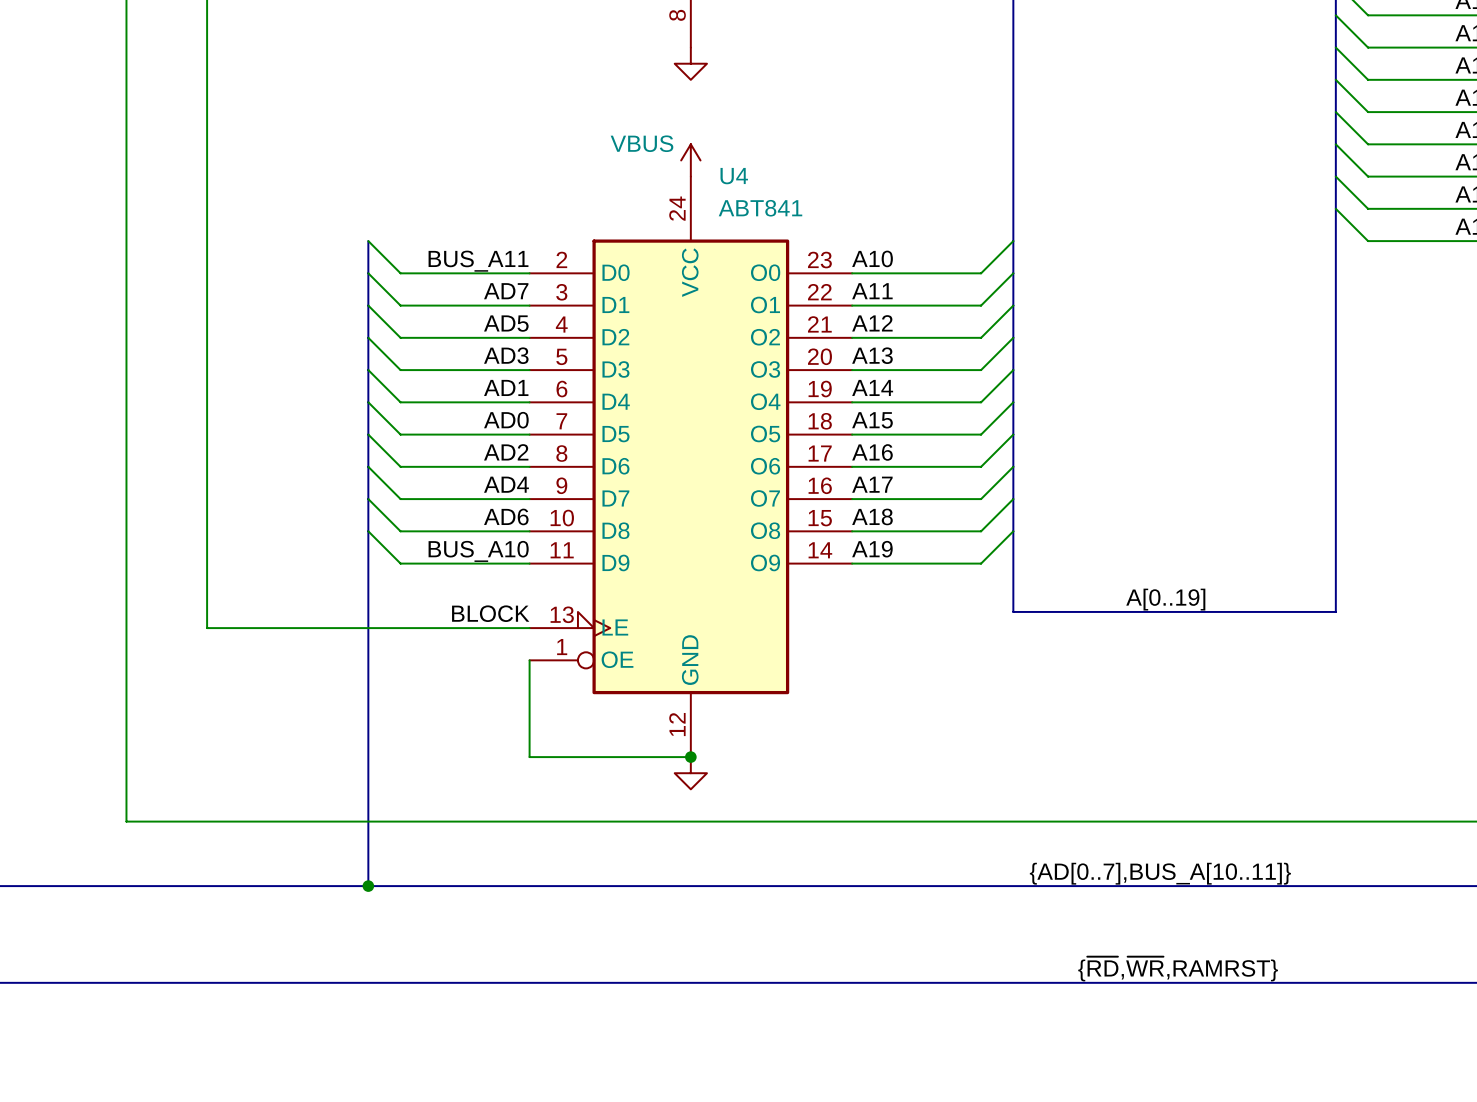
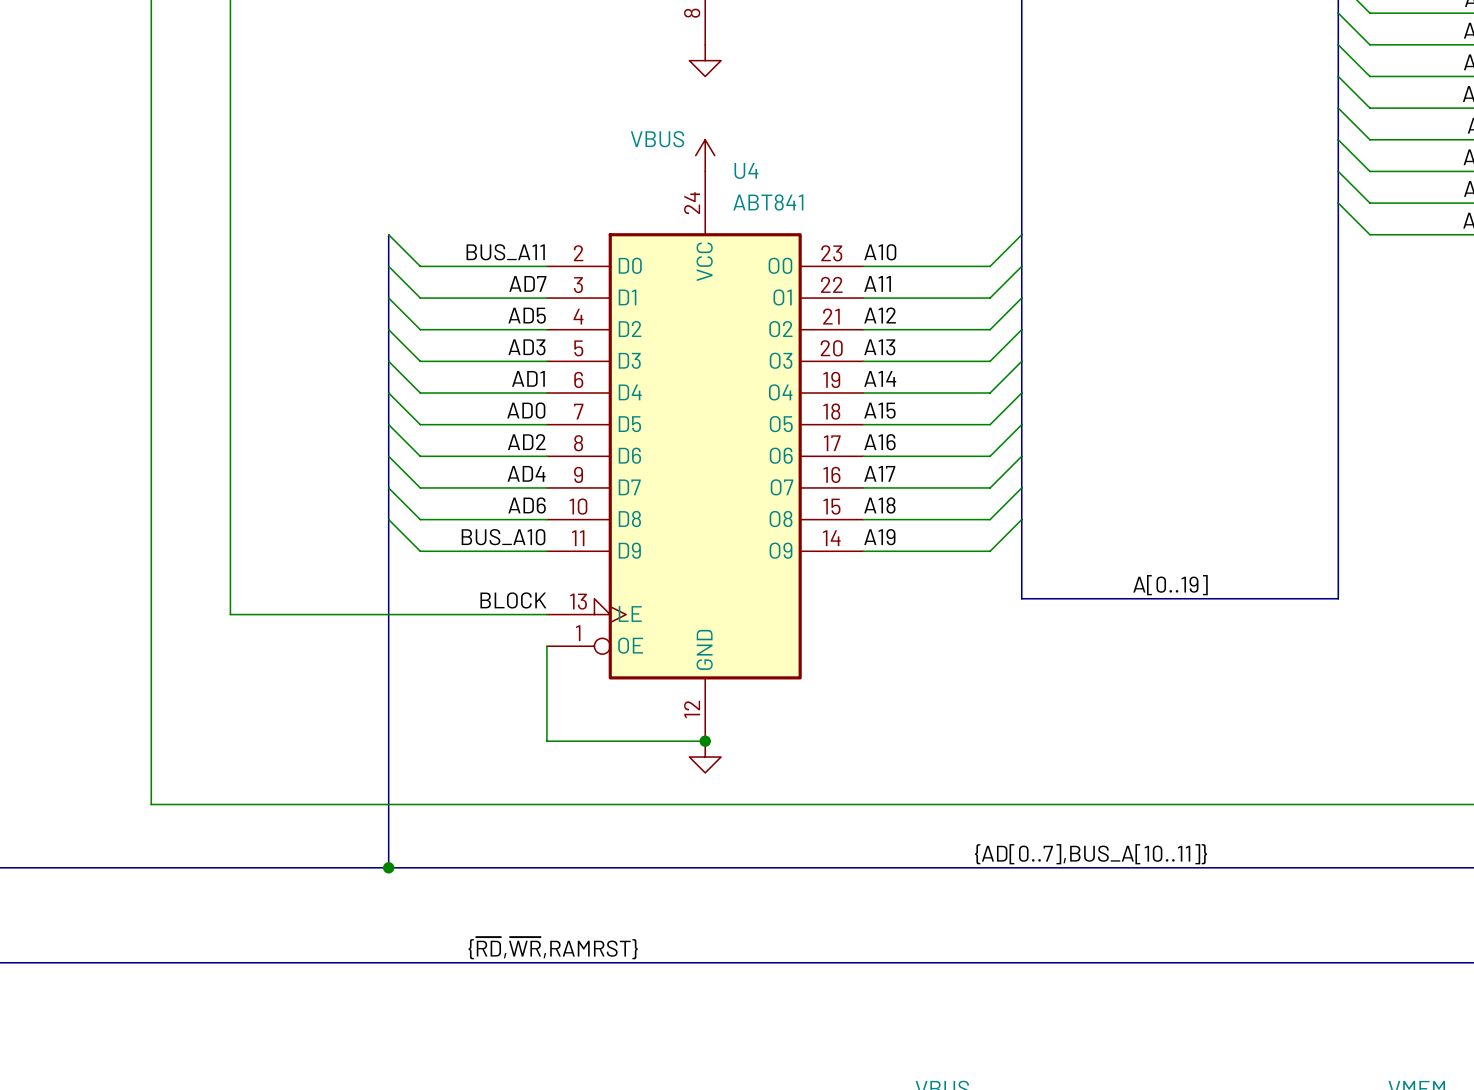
label position: {AD[0..7],BUS_A[10..11]} (1160, 873) -> {AD[0..7],BUS_A[10..11]} (1091, 854)
label: none -> {~{RD},~{WR},RAMRST} (553, 948)
label: {~{RD},~{WR},RAMRST} (1178, 969) -> none

